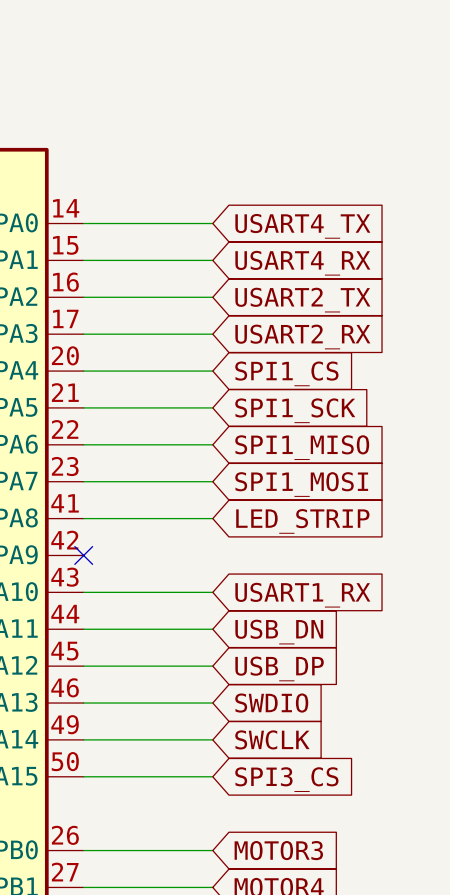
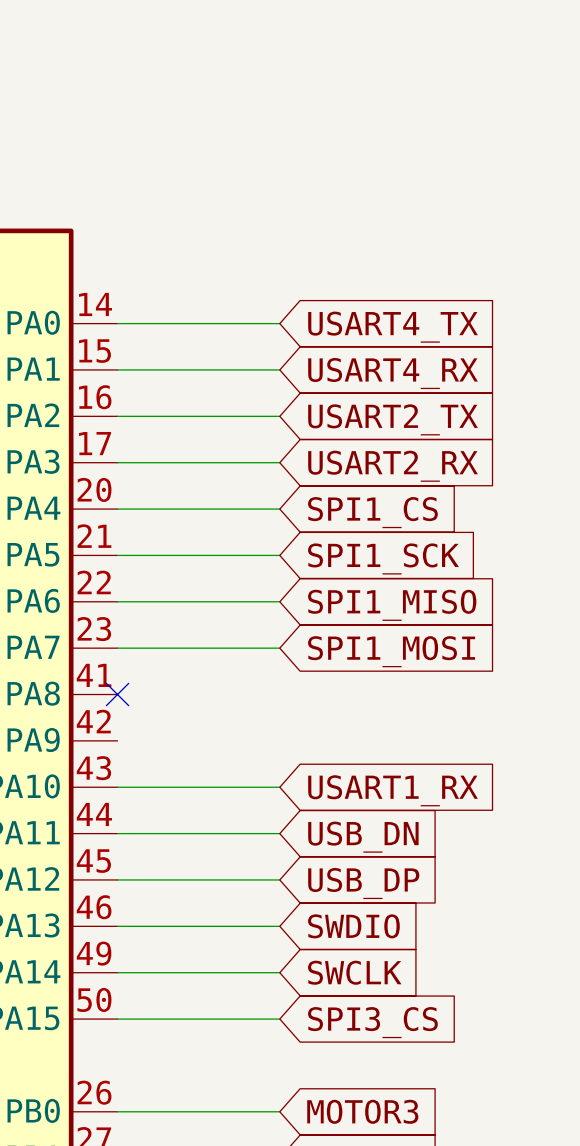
wire: (83, 518) (212, 518) -> none
global label: LED_STRIP (302, 521) -> none
no-connect mark position: (83, 555) -> (117, 694)

